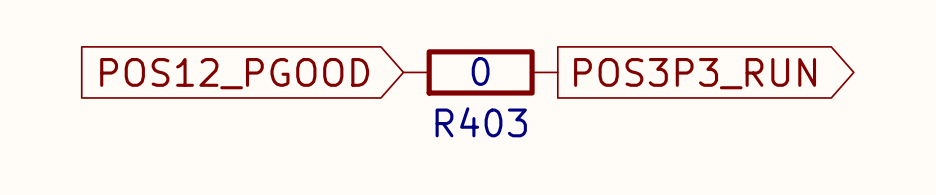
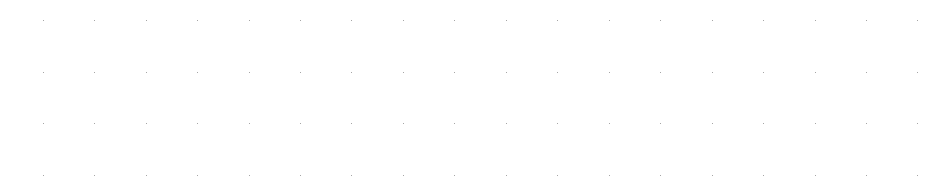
R403: 0 (480, 72) -> none
global label: POS12_PGOOD (234, 73) -> none
global label: POS3P3_RUN (695, 73) -> none

